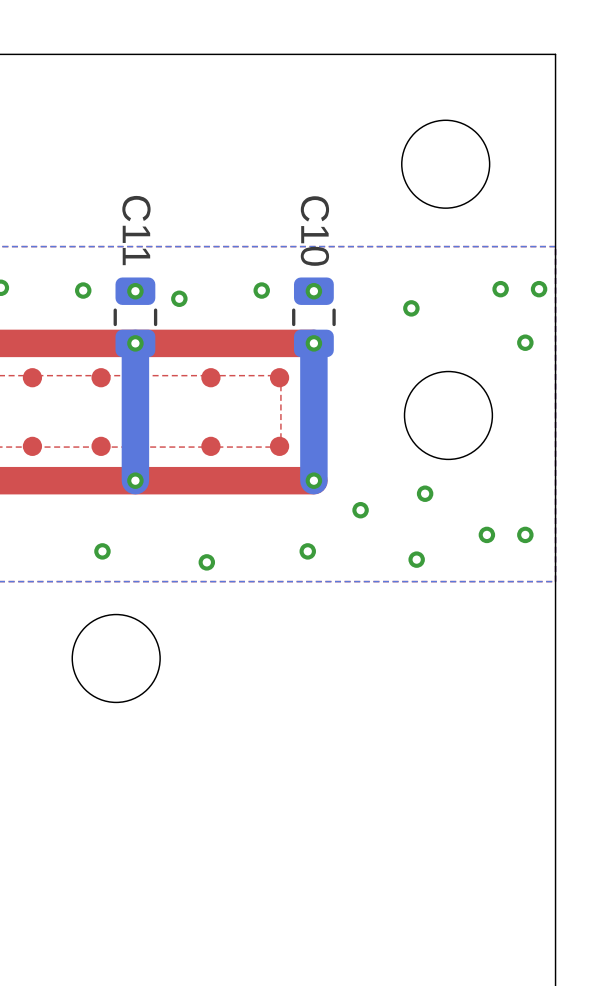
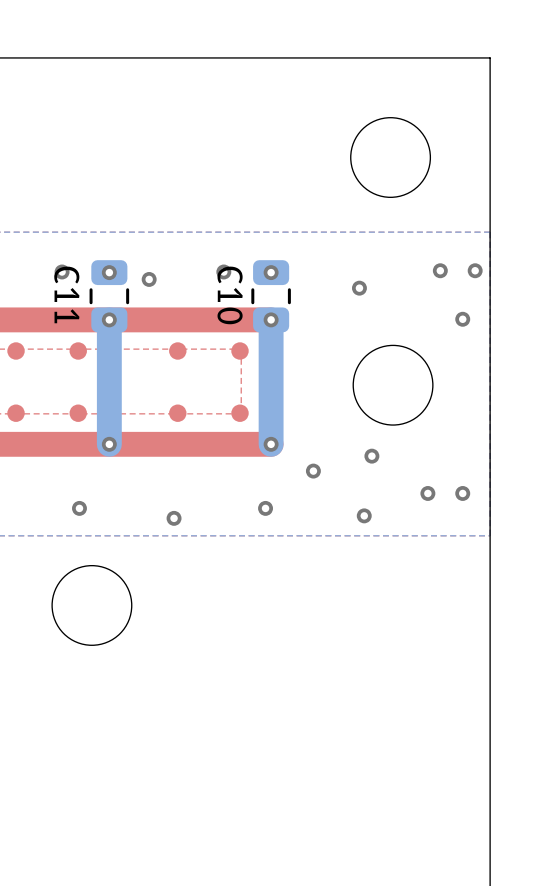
C11 name position: C11 (136, 230) -> C11 (66, 294)
C10 name position: C10 (314, 231) -> C10 (230, 295)

